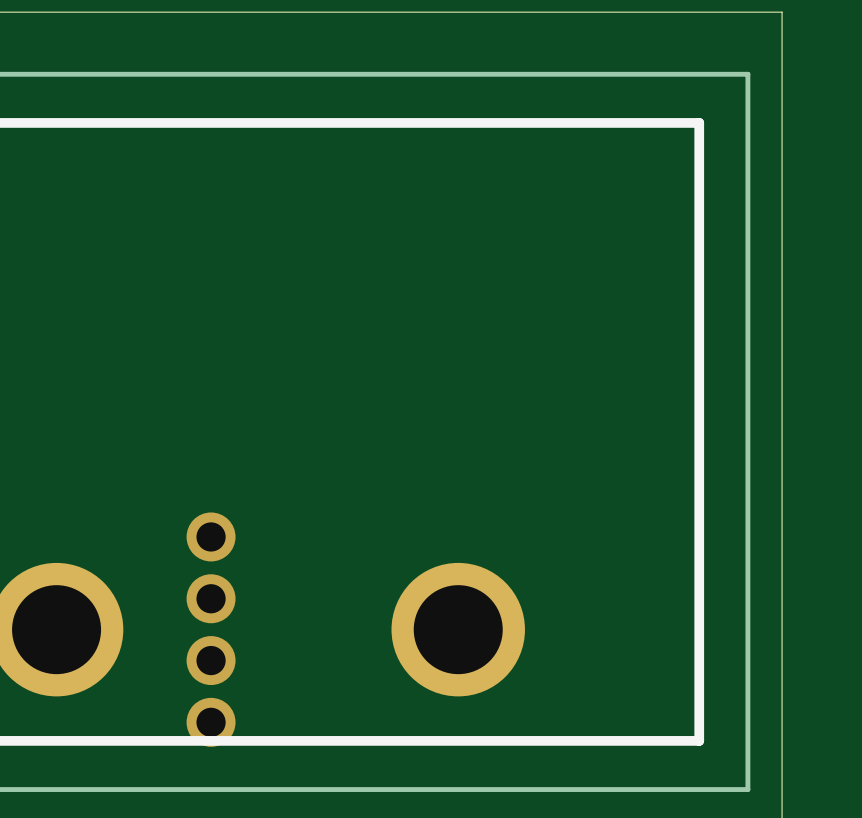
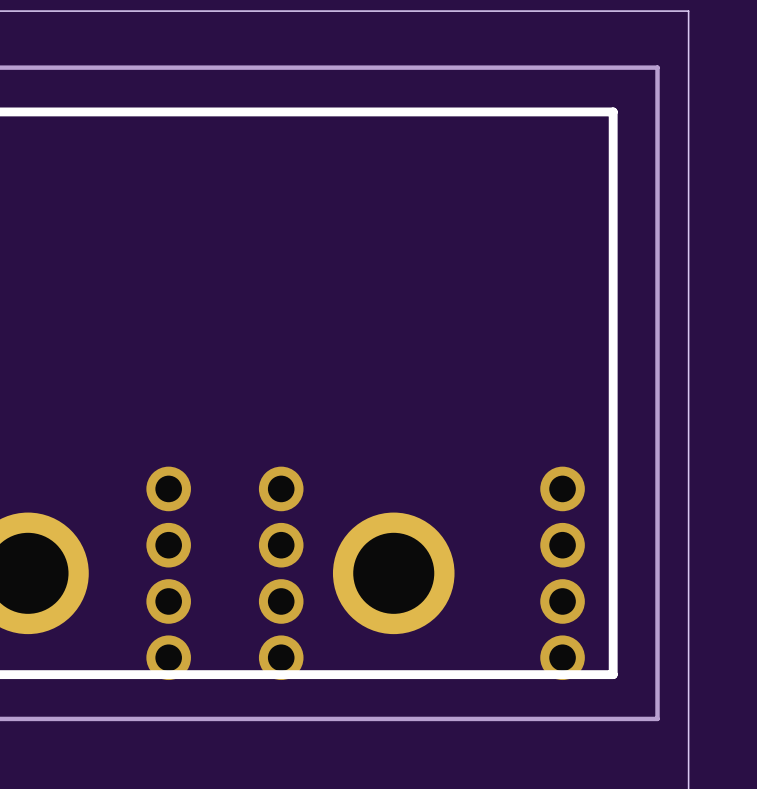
via: none -> (281, 488)
via: none -> (562, 488)
via: none -> (281, 545)
via: none -> (562, 545)
via: none -> (281, 601)
via: none -> (562, 601)
via: none -> (281, 657)
via: none -> (562, 657)

